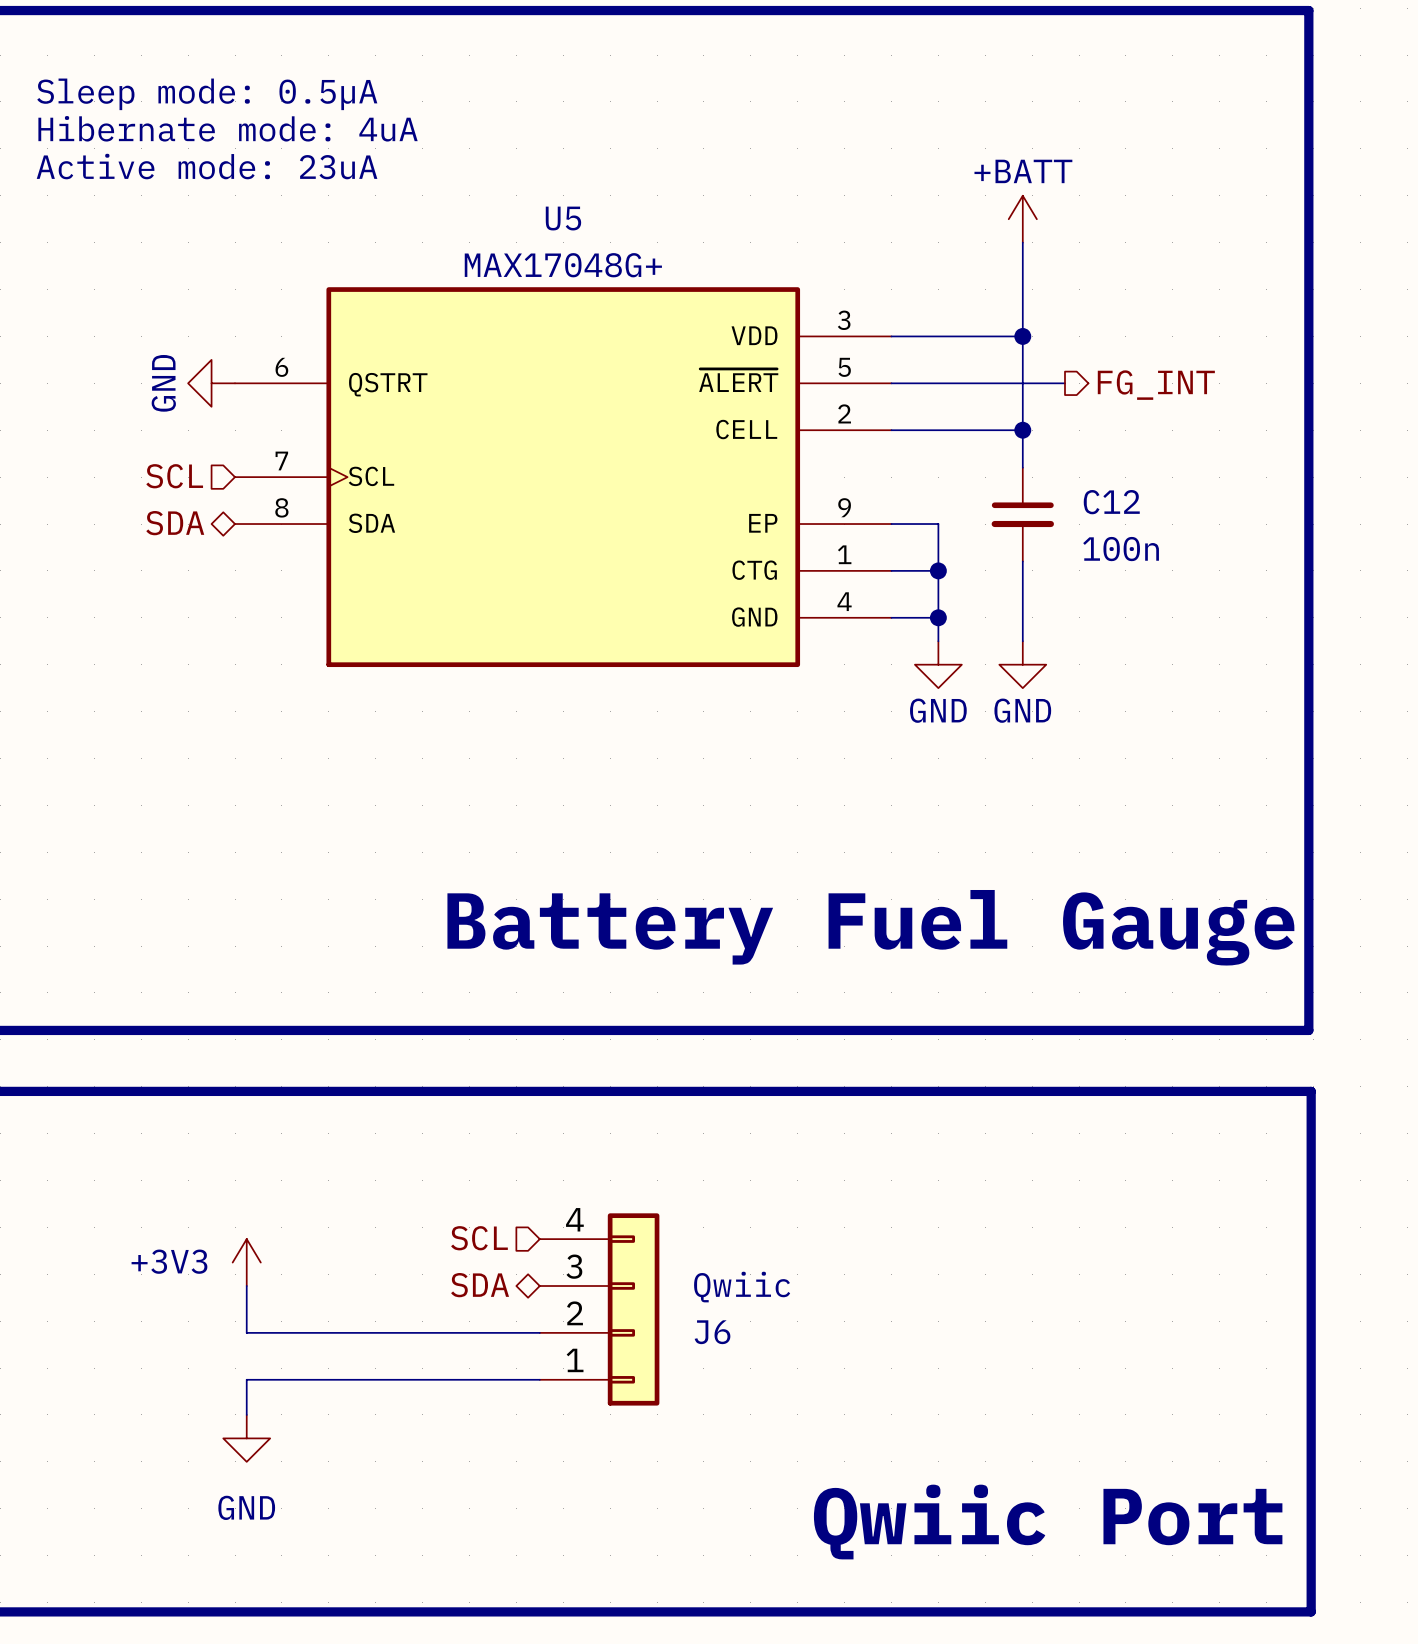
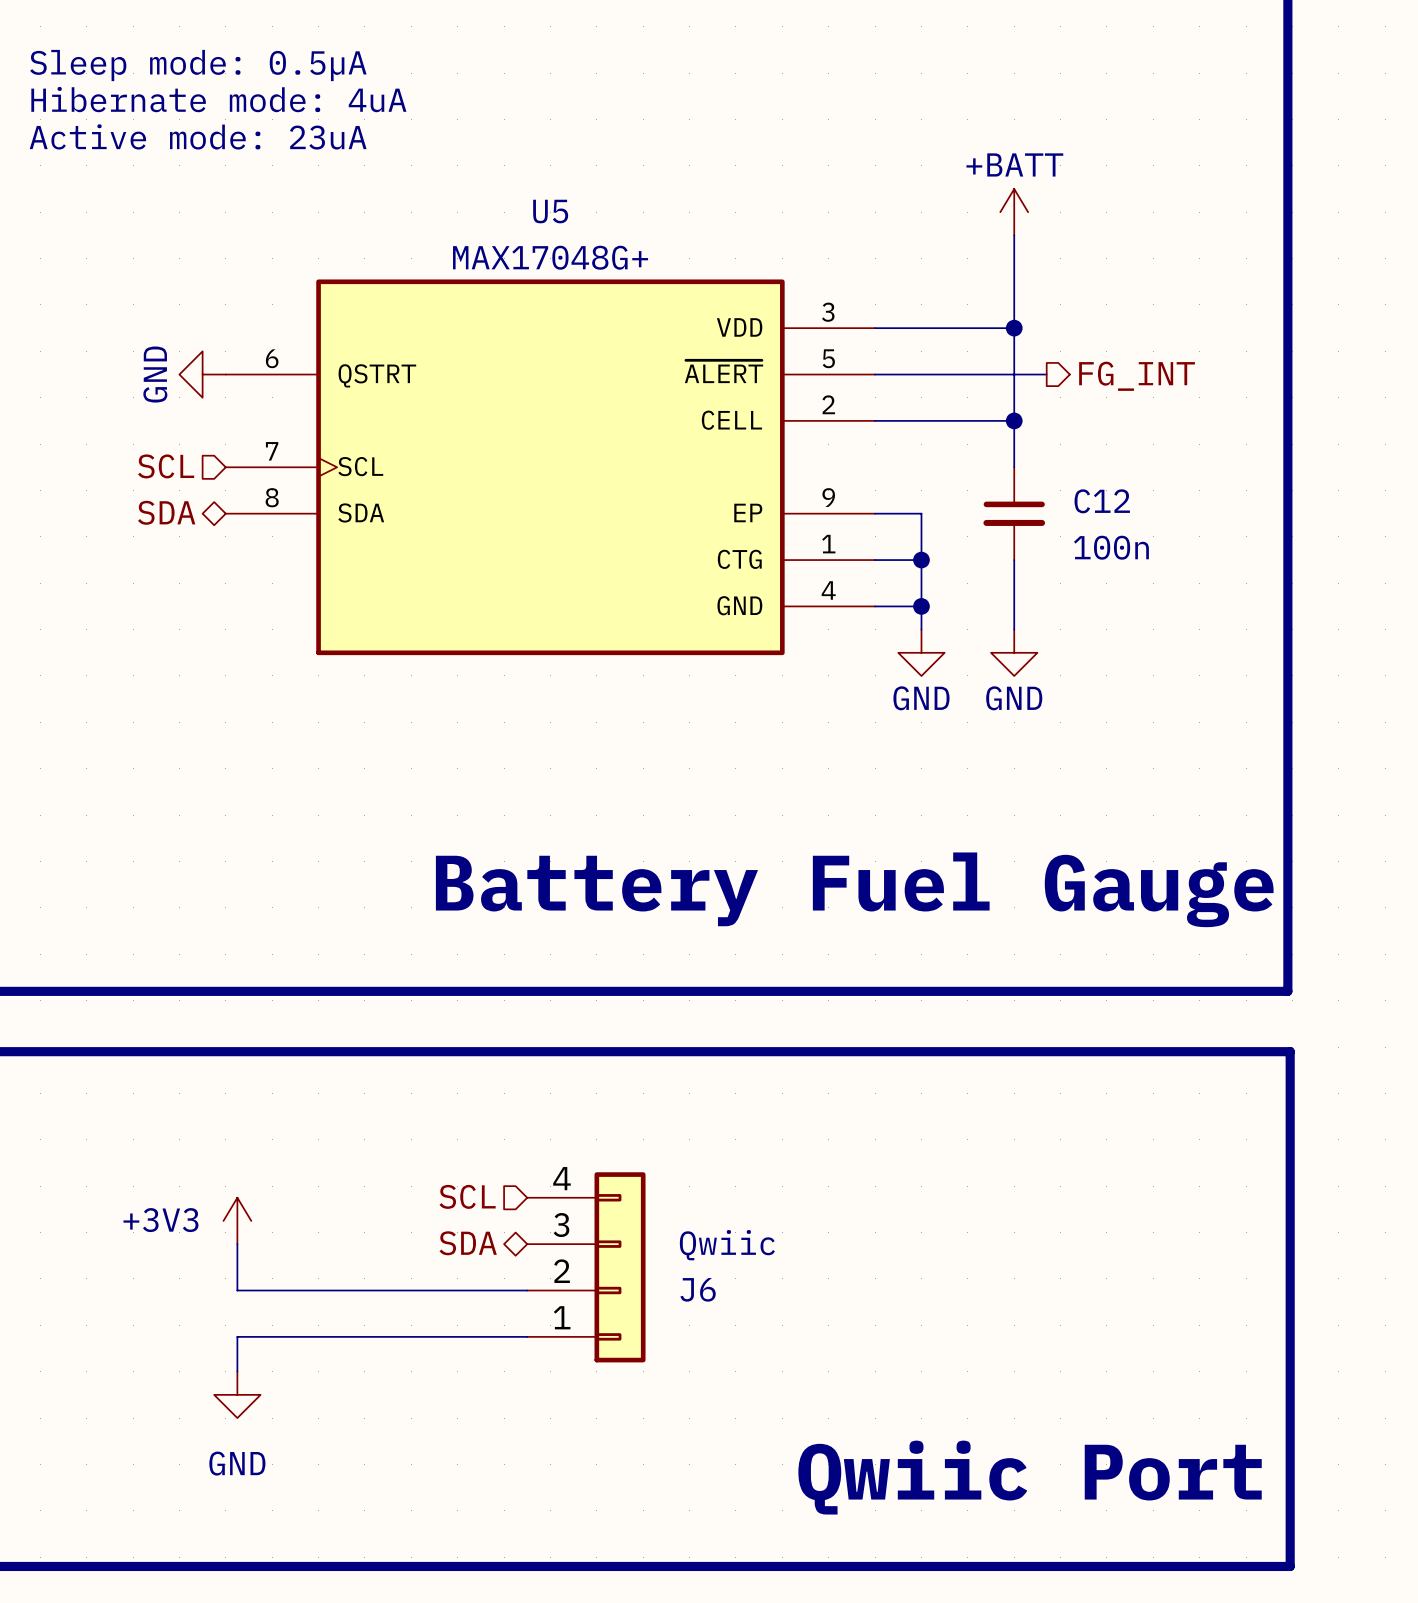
power symbol position: +BATT (1022, 219) -> +BATT (1014, 212)
wire: (1022, 242) (1022, 467) -> none
wire: none -> (1014, 235) (1014, 467)
wire: (891, 336) (1022, 336) -> none
junction position: (1022, 336) -> (1014, 328)
wire: none -> (875, 328) (1014, 328)
power symbol position: GND (211, 383) -> GND (202, 374)
wire: (891, 383) (1064, 383) -> (875, 374) (1046, 374)
hierarchical label position: FG_INT (1156, 385) -> FG_INT (1137, 376)
wire: (891, 430) (1022, 430) -> none
junction position: (1022, 430) -> (1014, 420)
wire: none -> (875, 420) (1014, 420)
hierarchical label position: SCL (174, 476) -> SCL (166, 466)
U5 position: (563, 477) -> (550, 467)
C12 position: (1022, 514) -> (1014, 513)
hierarchical label position: SDA (175, 523) -> SDA (166, 512)
wire: (891, 524) (938, 524) (938, 547) -> (875, 513) (921, 513)
wire: (1022, 561) (1022, 641) -> none
wire: (891, 570) (938, 570) -> (875, 560) (921, 560)
junction: (938, 570) -> none
junction: none -> (921, 560)
wire: none -> (1014, 560) (1014, 629)
wire: (891, 617) (938, 617) -> none
junction: (938, 617) -> none
wire: none -> (875, 606) (921, 606) (921, 629)
junction: none -> (921, 606)
power symbol position: GND (938, 664) -> GND (921, 652)
power symbol position: GND (1022, 664) -> GND (1014, 652)

